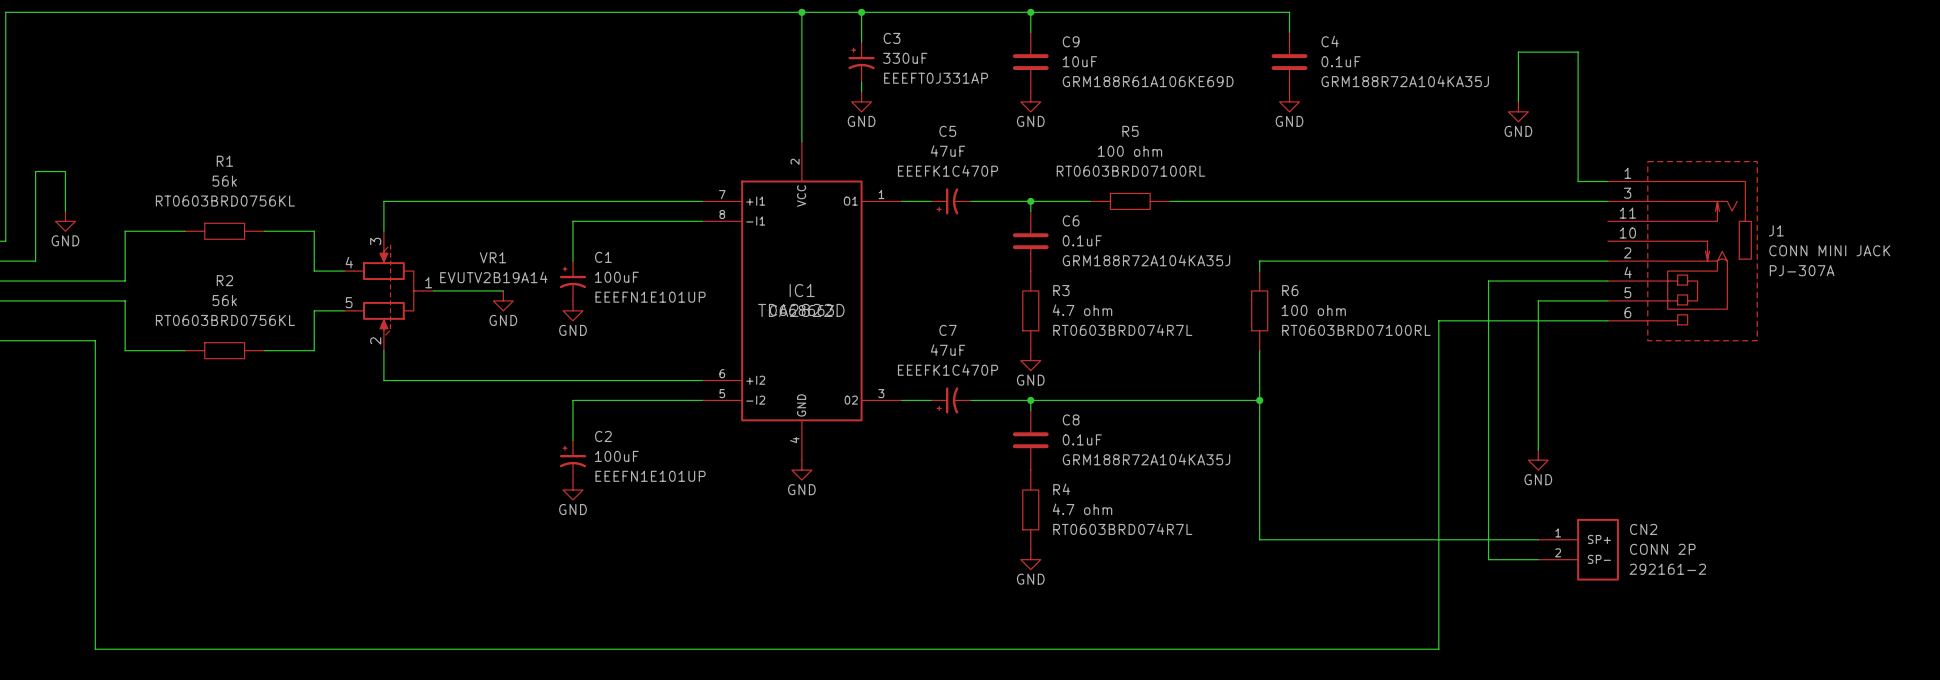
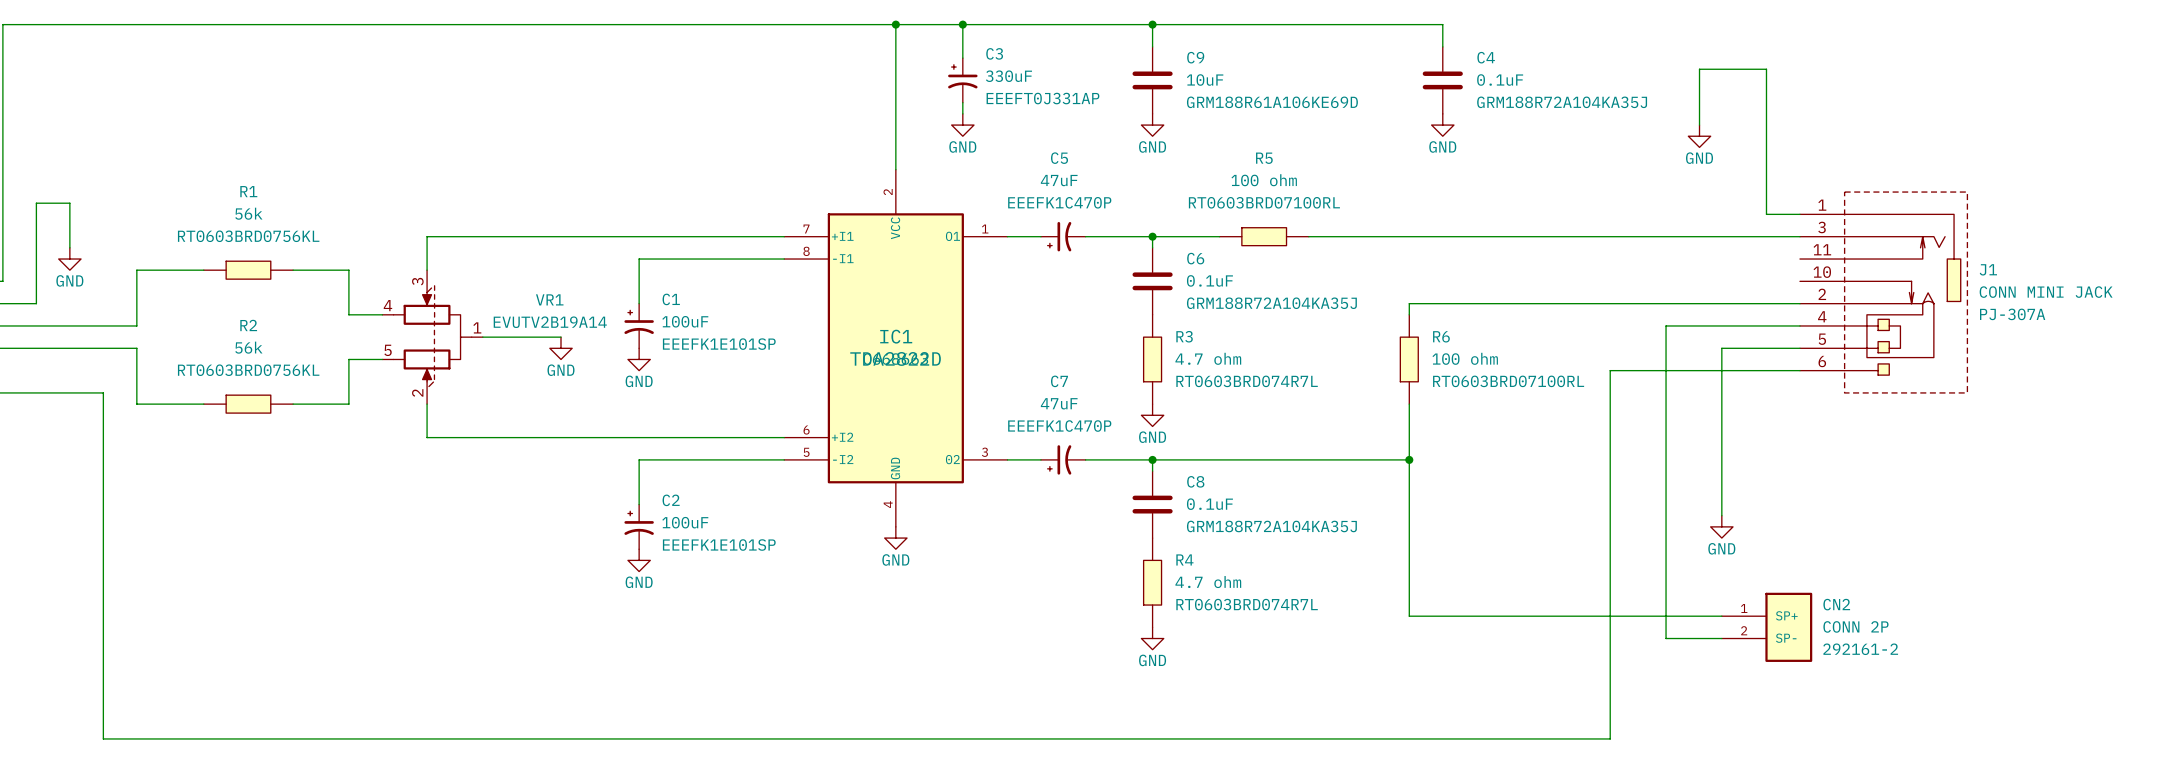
C1 text: EEEFN1E101UP (650, 297) -> EEEFK1E101SP (719, 344)
C2 text: EEEFN1E101UP (650, 476) -> EEEFK1E101SP (719, 545)

